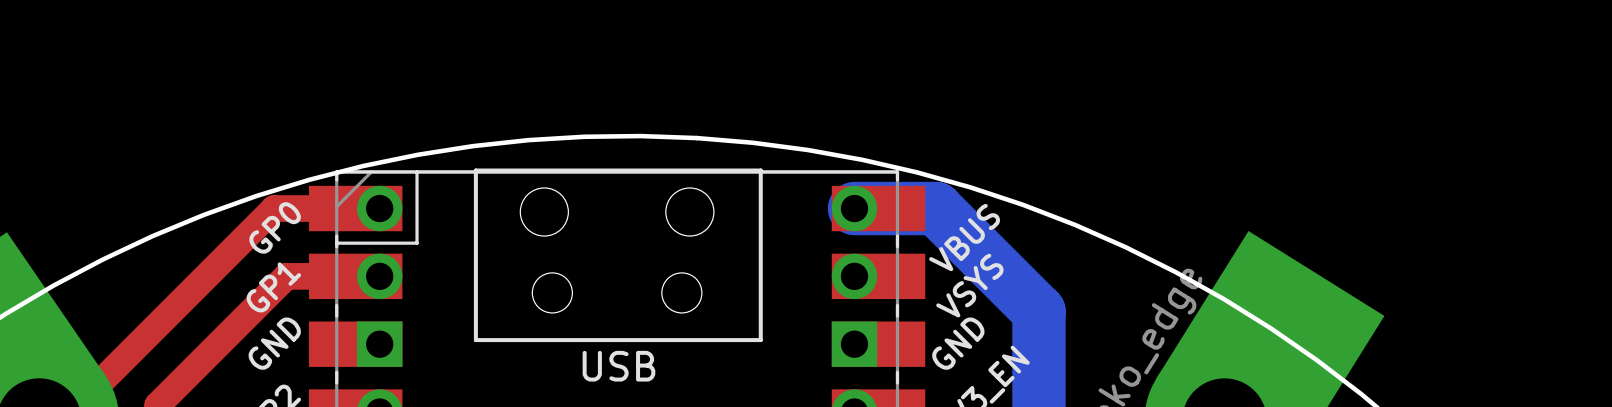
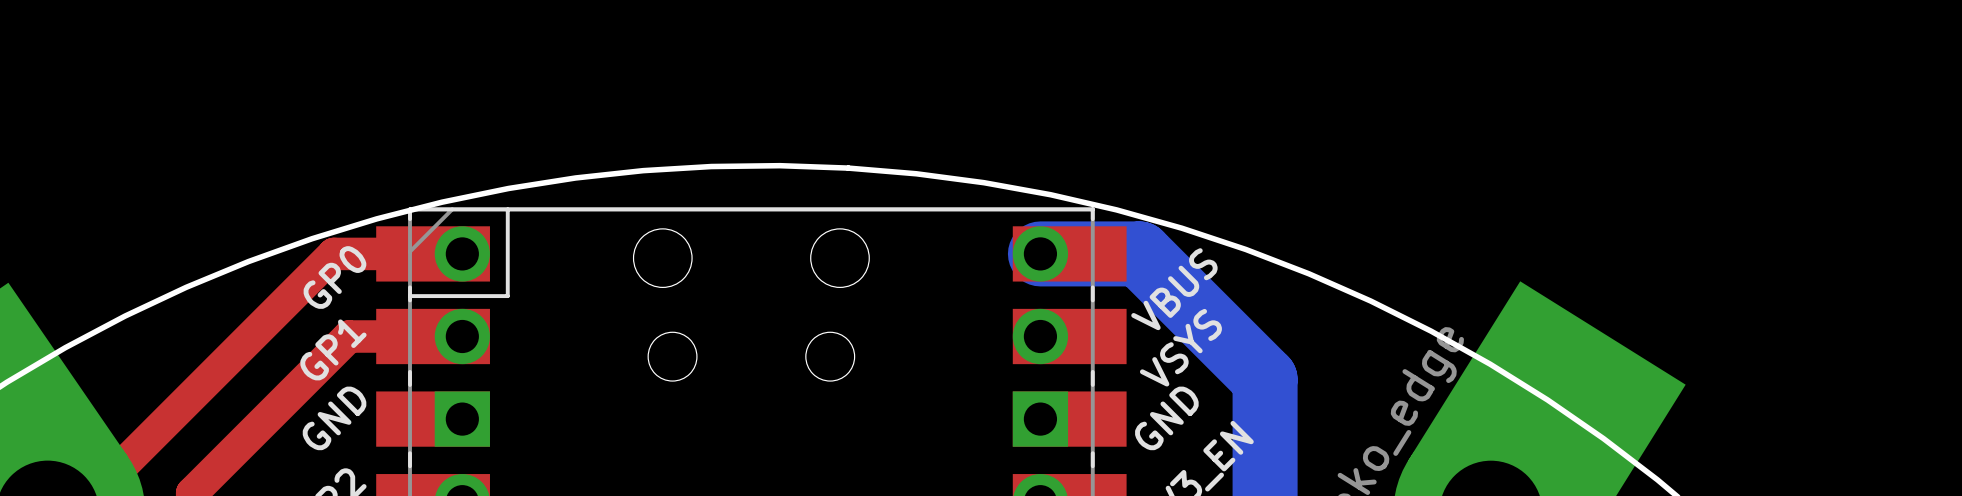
line: (475, 170) (760, 170) (760, 340) (475, 340) (475, 170) -> none
text: USB (618, 366) -> none

